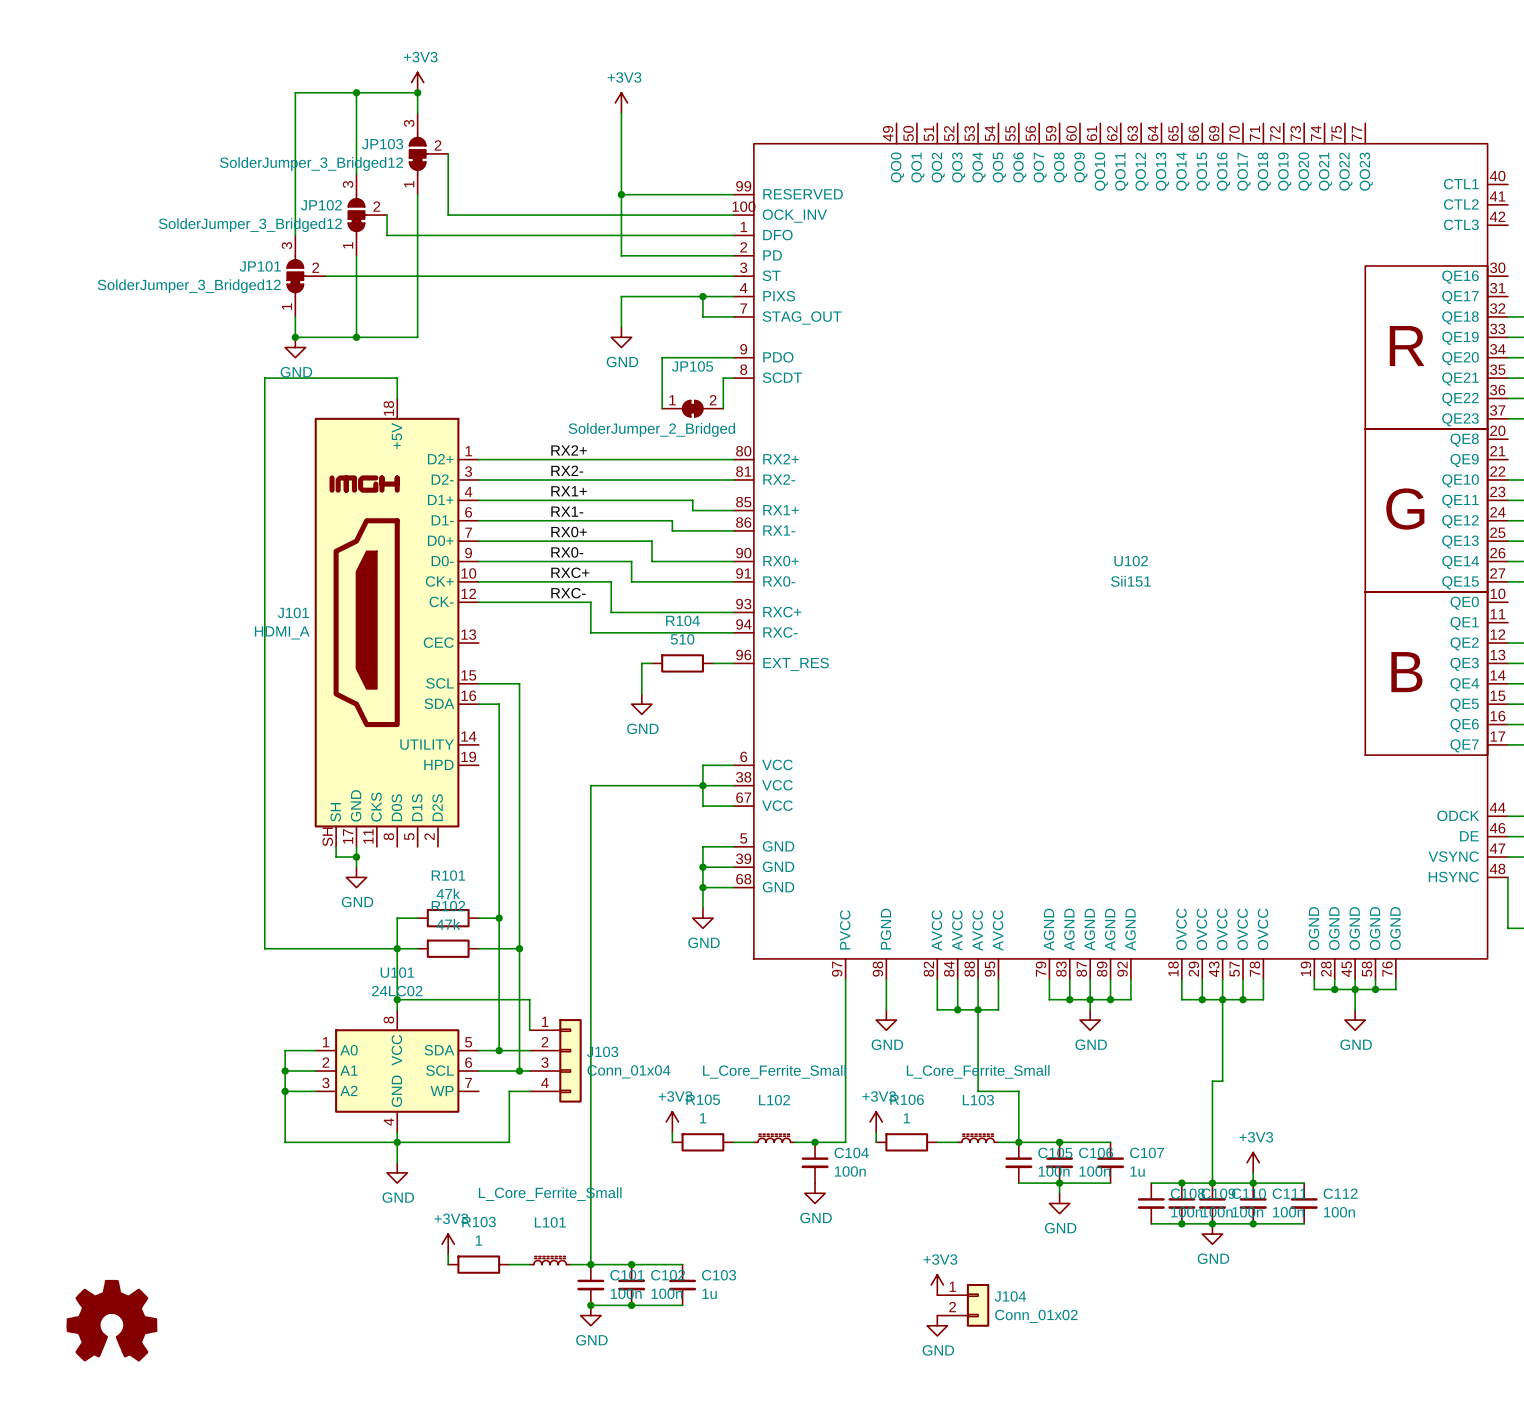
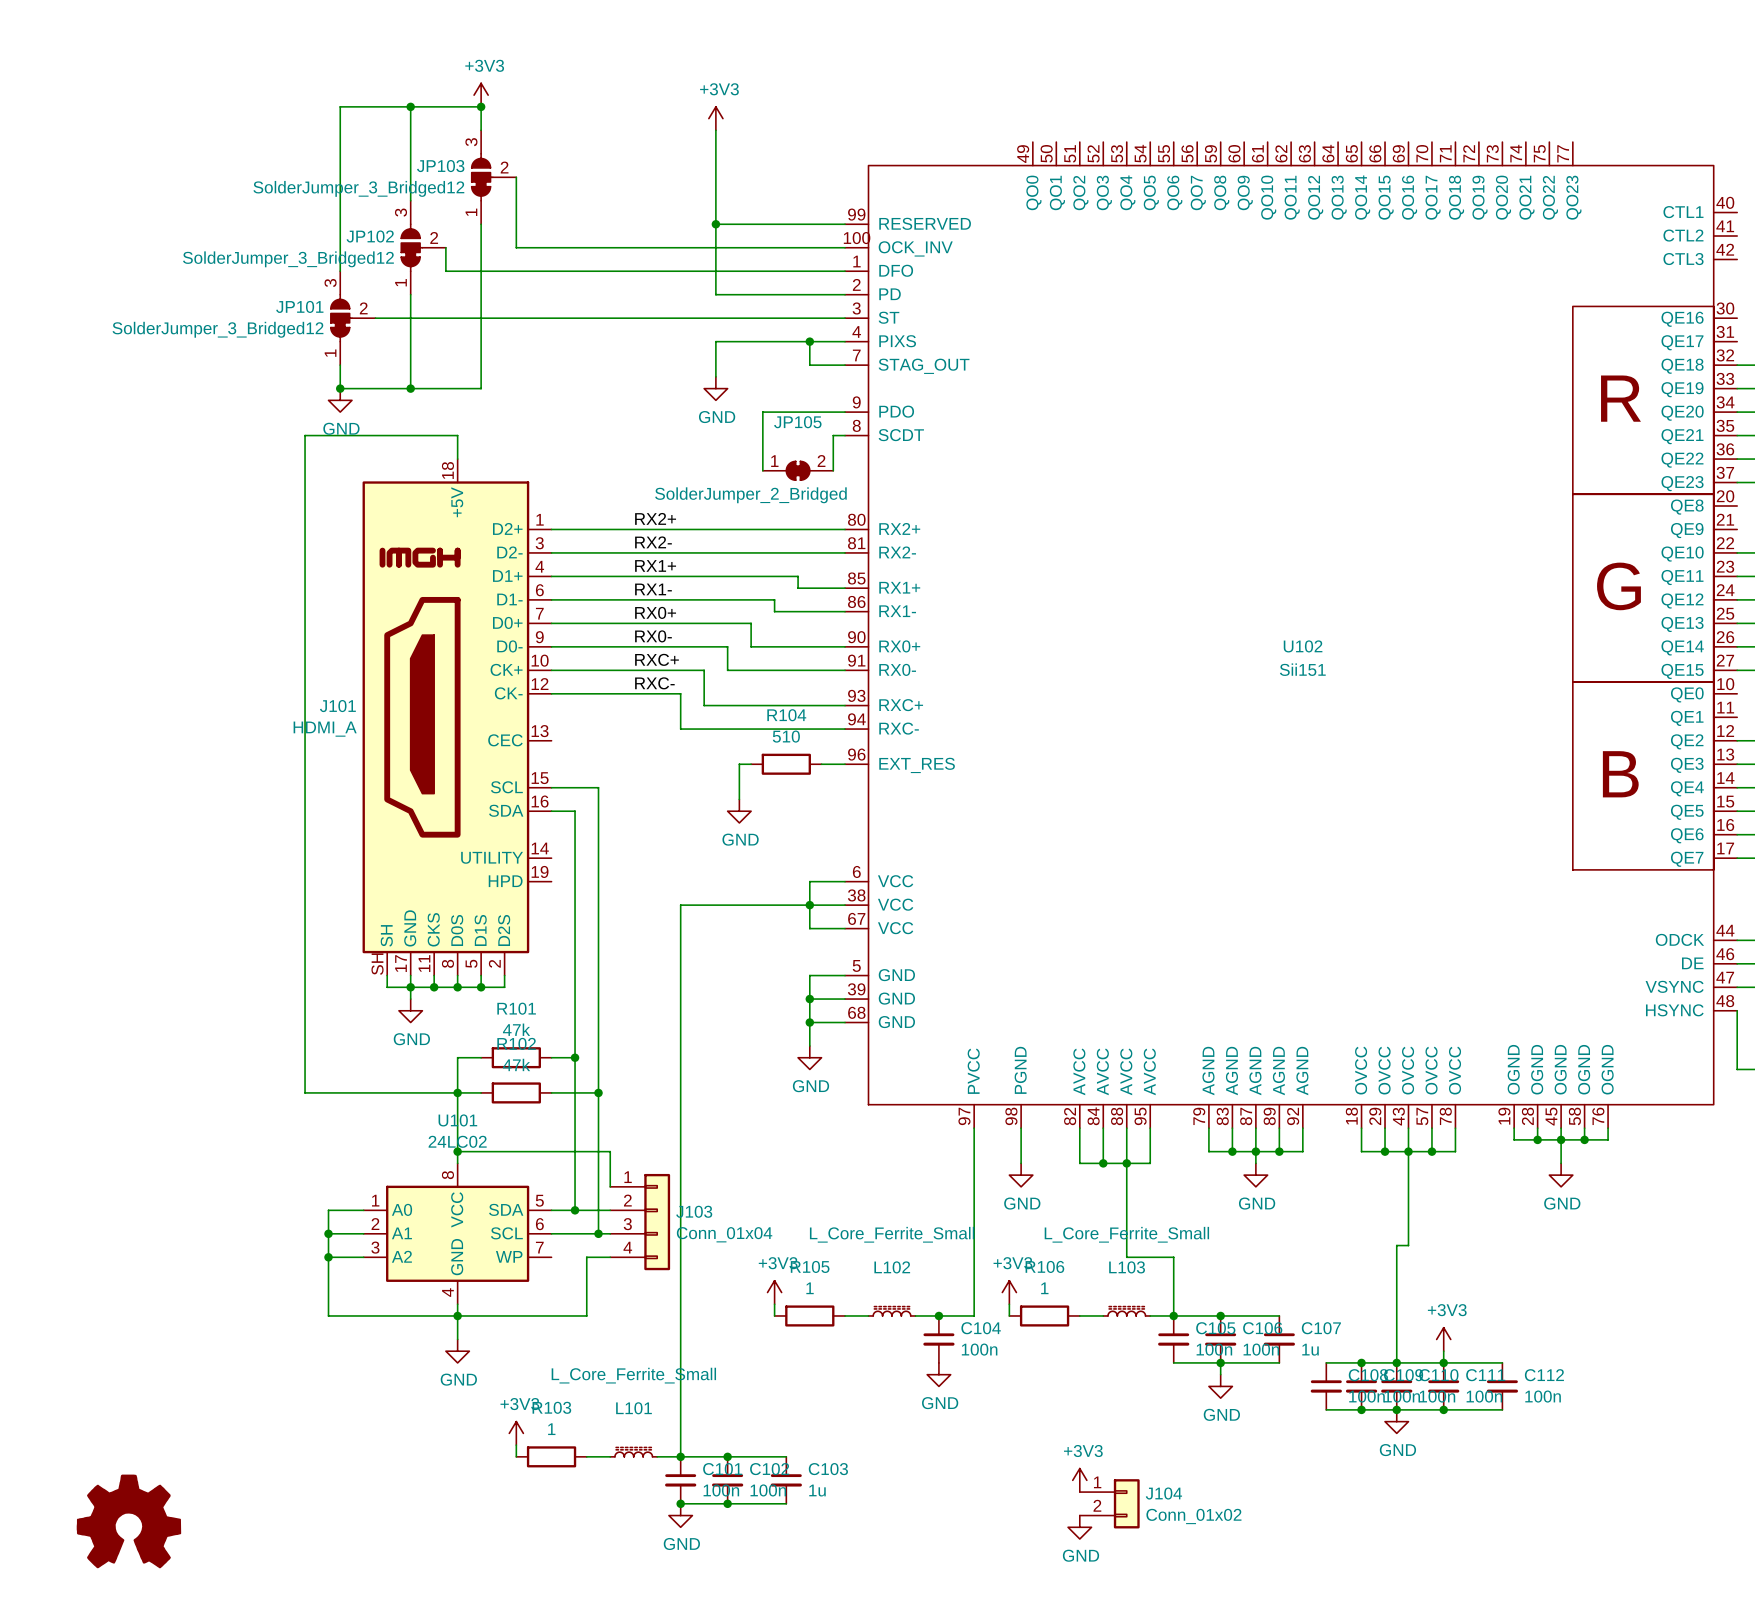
wire: none -> (434, 975) (434, 987)
wire: none -> (457, 975) (457, 987)
wire: none -> (481, 975) (481, 987)
wire: none -> (504, 975) (504, 987) (410, 987)
junction: none -> (434, 987)
junction: none -> (457, 987)
junction: none -> (481, 987)

